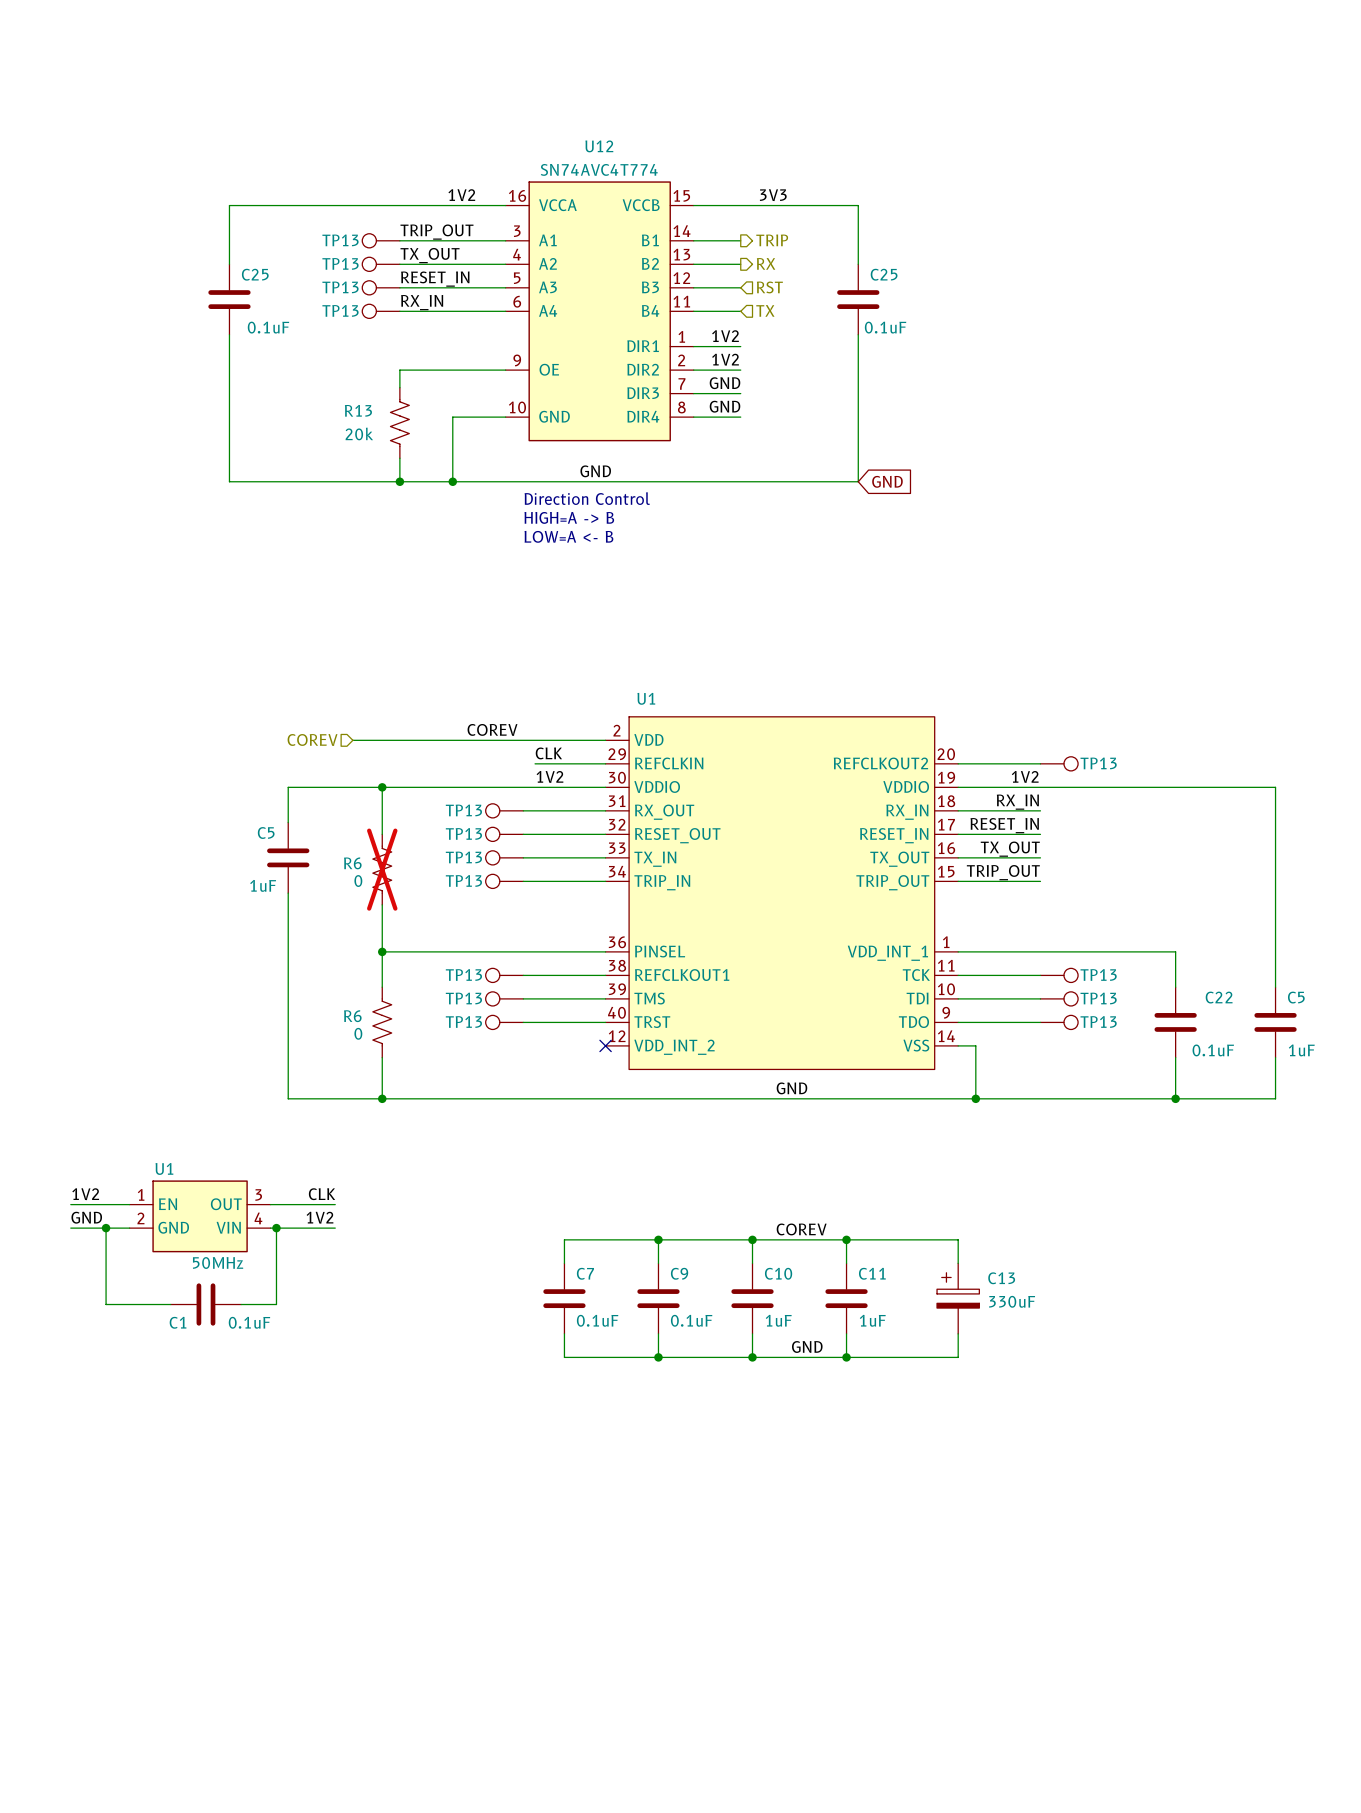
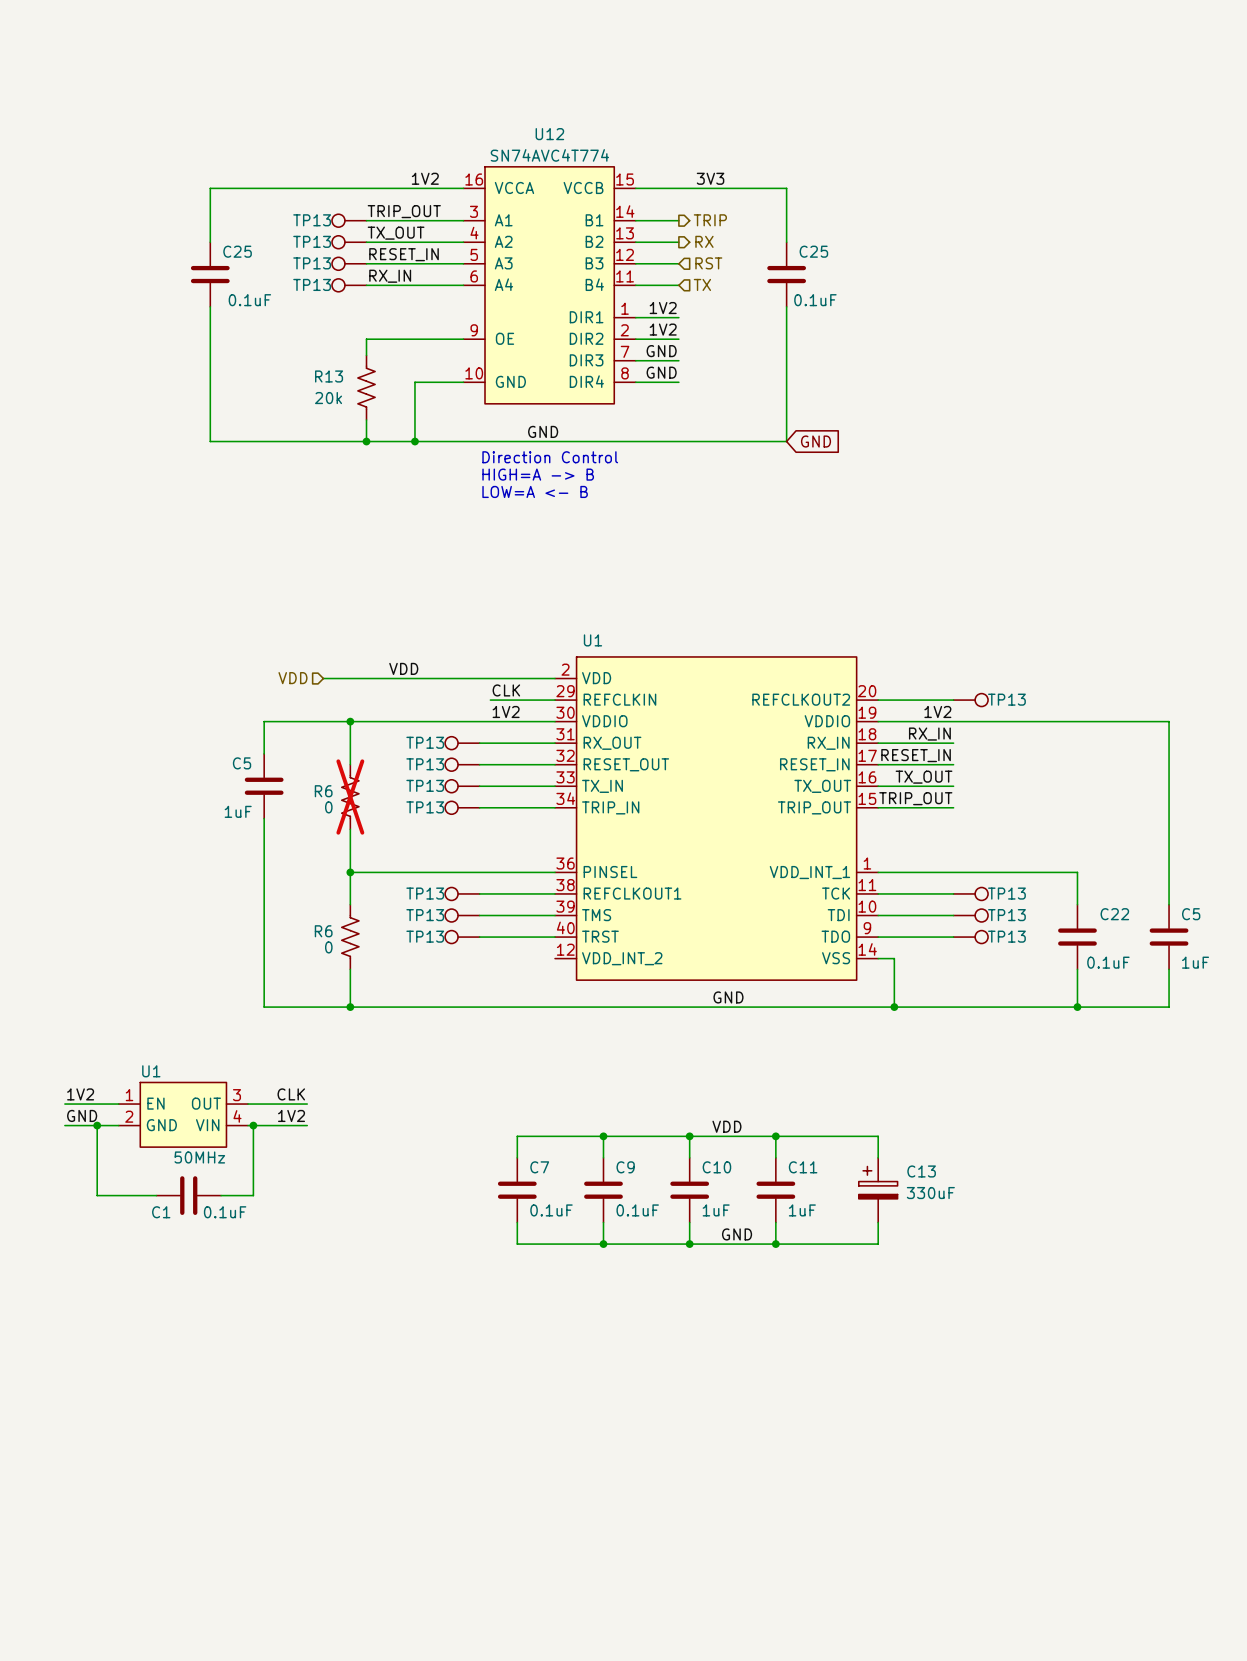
label: none -> VDD (403, 668)
label: COREV (492, 729) -> none
hierarchical label: COREV (312, 739) -> VDD (292, 678)
no-connect mark: (605, 1045) -> none
label: COREV (801, 1229) -> VDD (726, 1126)

